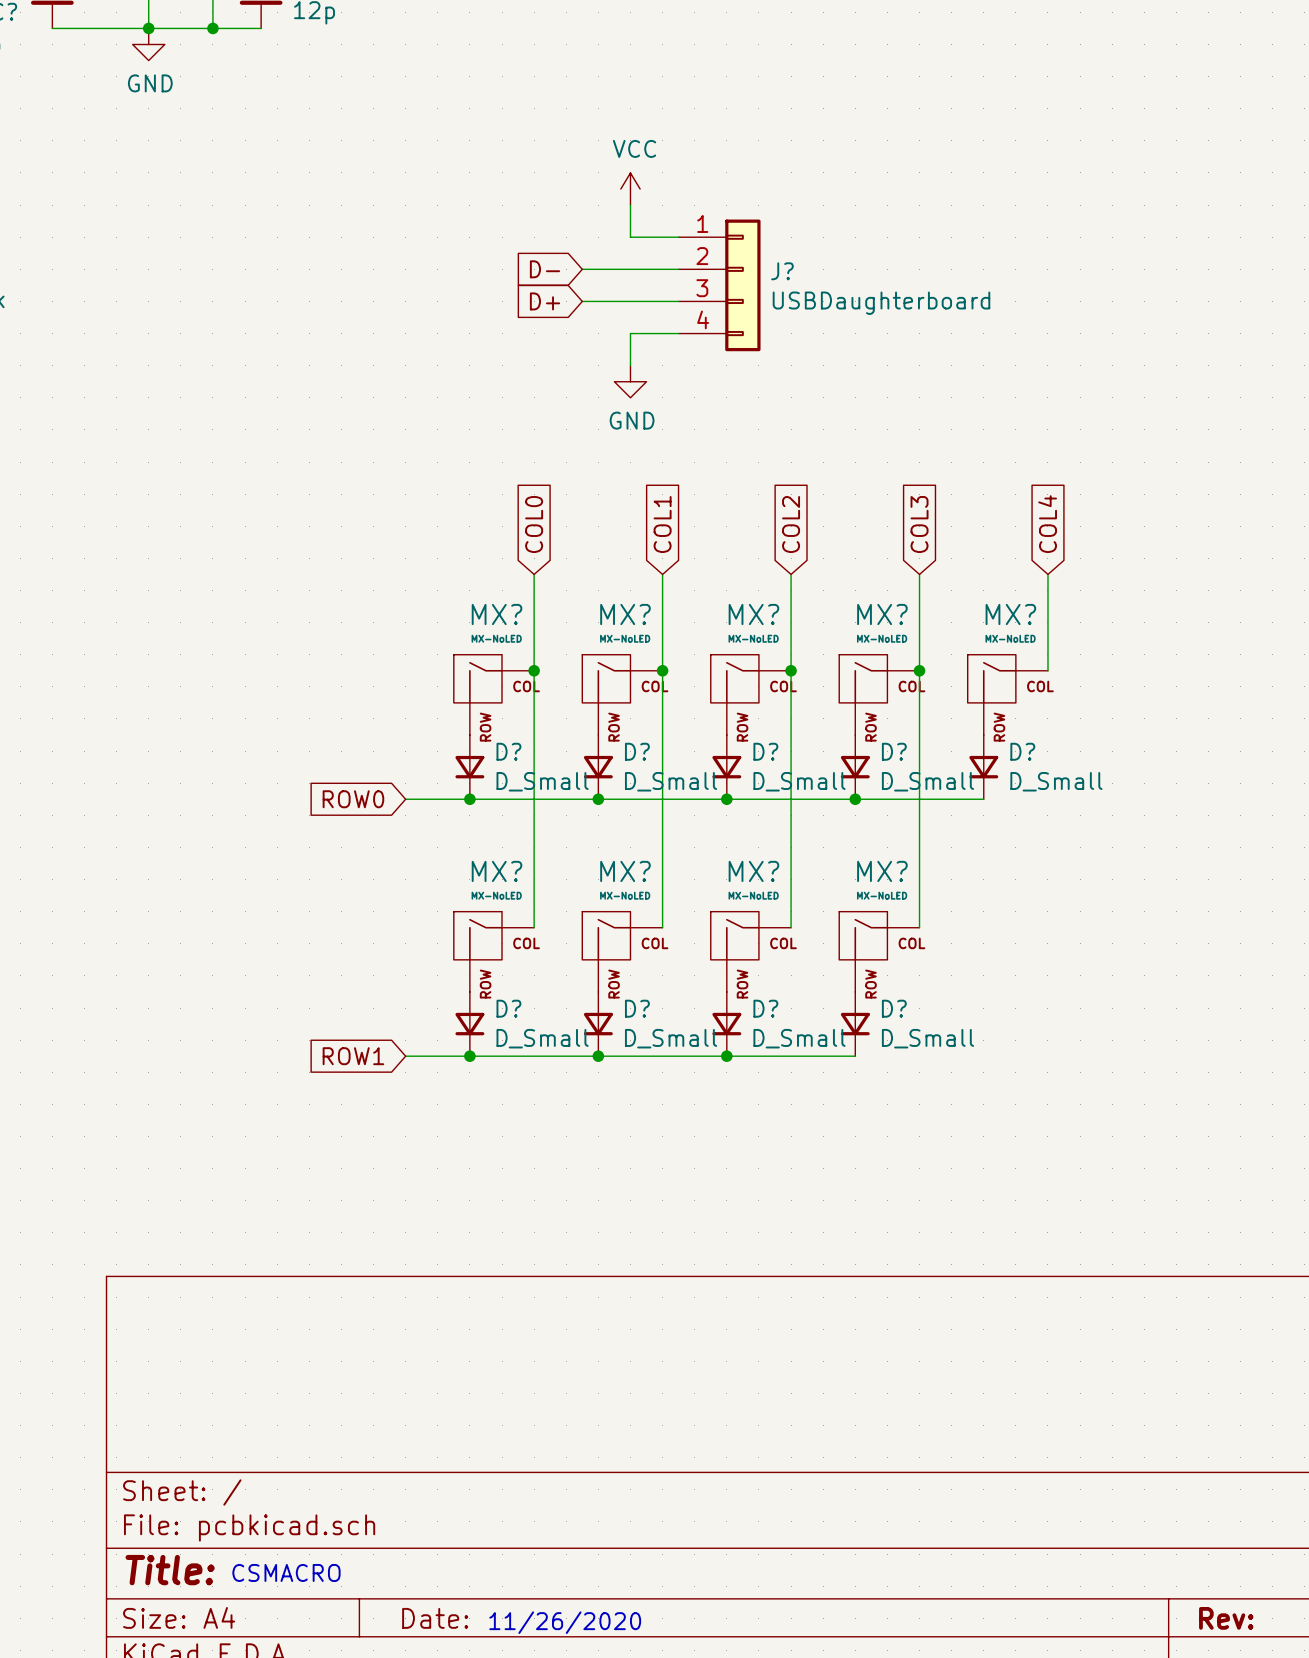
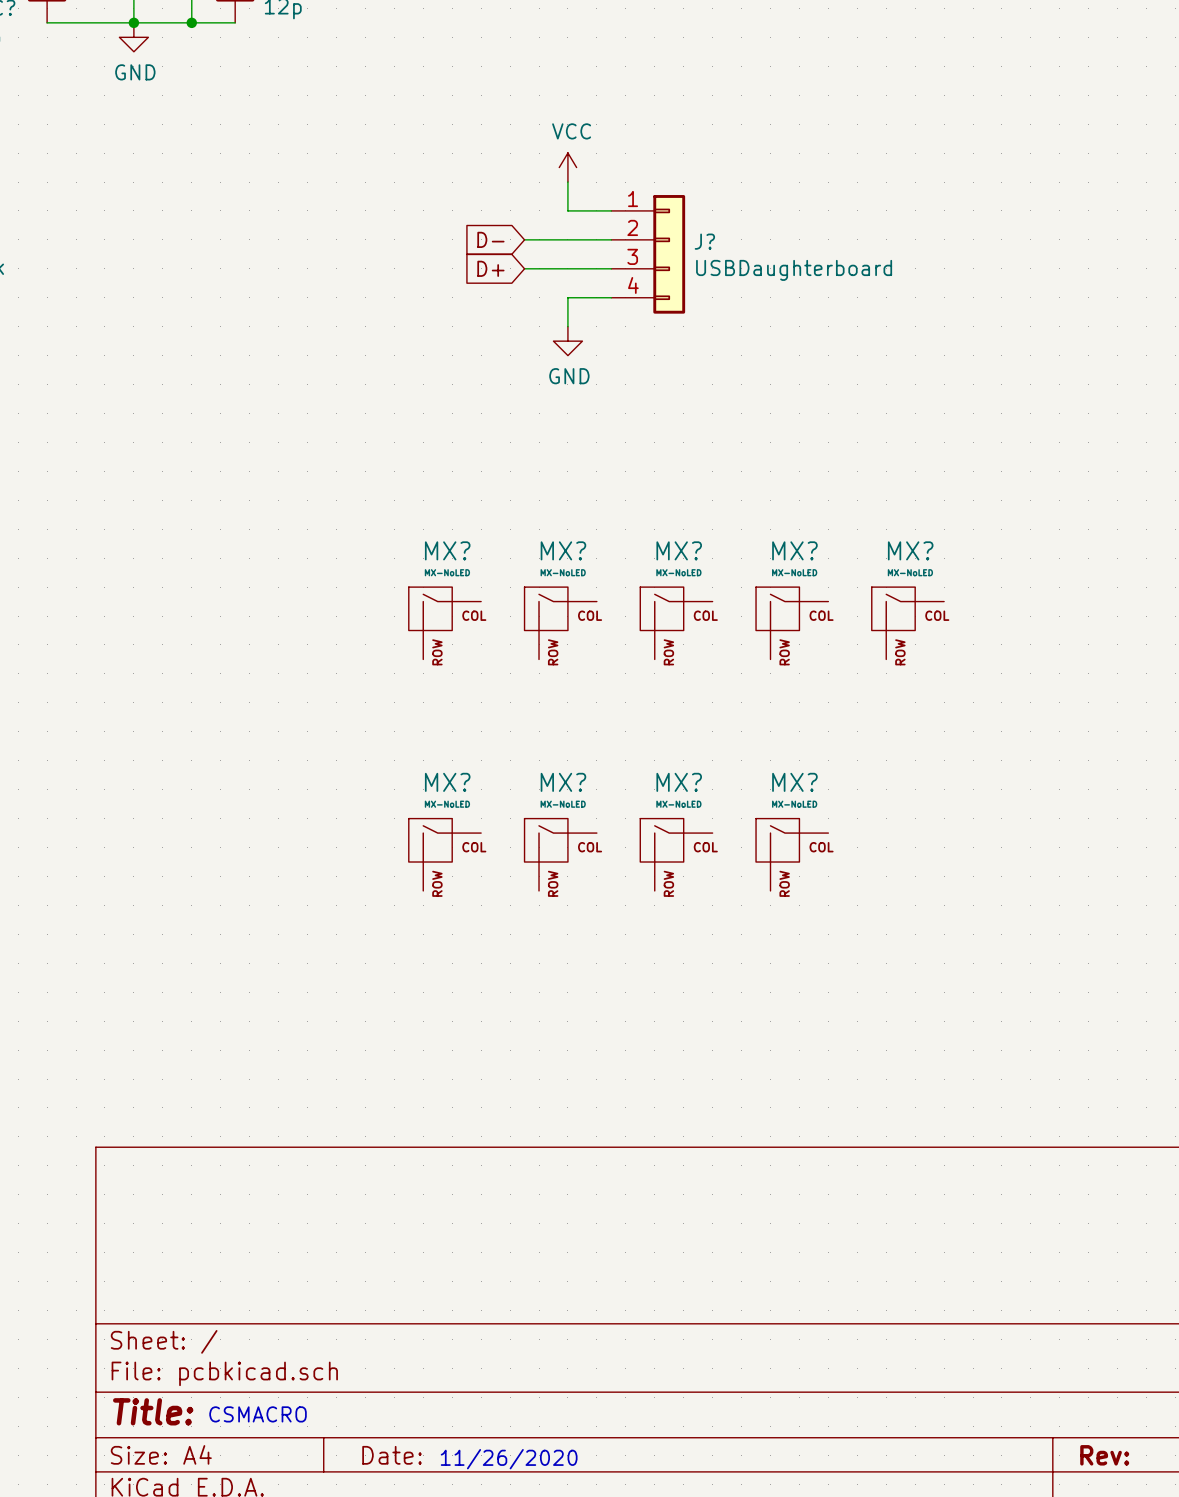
global label: COL0 (534, 524) -> none
global label: COL1 (662, 524) -> none
global label: COL2 (791, 524) -> none
global label: COL3 (919, 524) -> none
global label: COL4 (1047, 524) -> none
wire: (534, 574) (534, 927) -> none
wire: (662, 574) (662, 927) -> none
wire: (791, 574) (791, 927) -> none
wire: (919, 574) (919, 927) -> none
wire: (1047, 574) (1047, 670) -> none
junction: (534, 670) -> none
junction: (662, 670) -> none
junction: (791, 670) -> none
junction: (919, 670) -> none
D?: D_Small (469, 767) -> none
D?: D_Small (598, 767) -> none
D?: D_Small (726, 767) -> none
D?: D_Small (855, 767) -> none
D?: D_Small (983, 767) -> none
global label: ROW0 (353, 799) -> none
wire: (405, 799) (983, 799) -> none
junction: (469, 799) -> none
junction: (598, 799) -> none
junction: (726, 799) -> none
junction: (855, 799) -> none
D?: D_Small (469, 1024) -> none
D?: D_Small (598, 1024) -> none
D?: D_Small (726, 1024) -> none
D?: D_Small (855, 1024) -> none
global label: ROW1 (353, 1056) -> none
wire: (405, 1056) (855, 1056) -> none
junction: (469, 1056) -> none
junction: (598, 1056) -> none
junction: (726, 1056) -> none

